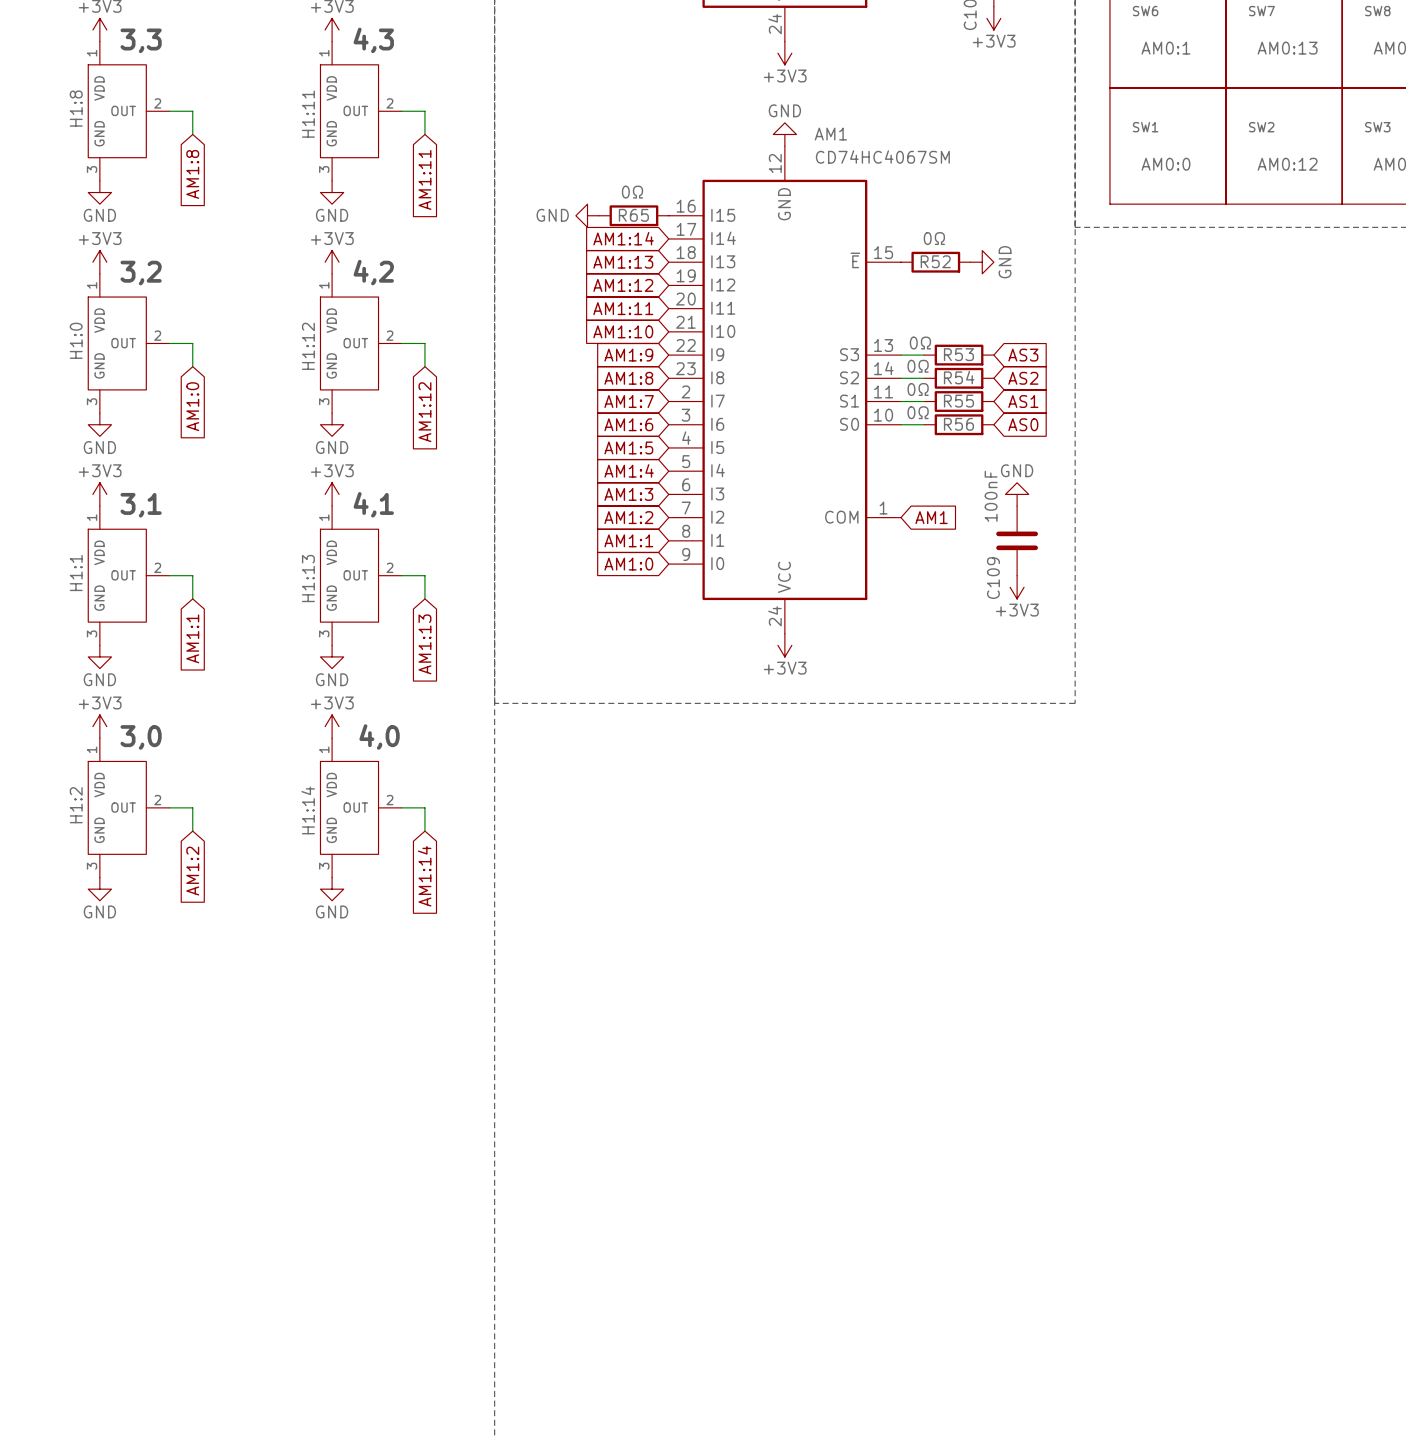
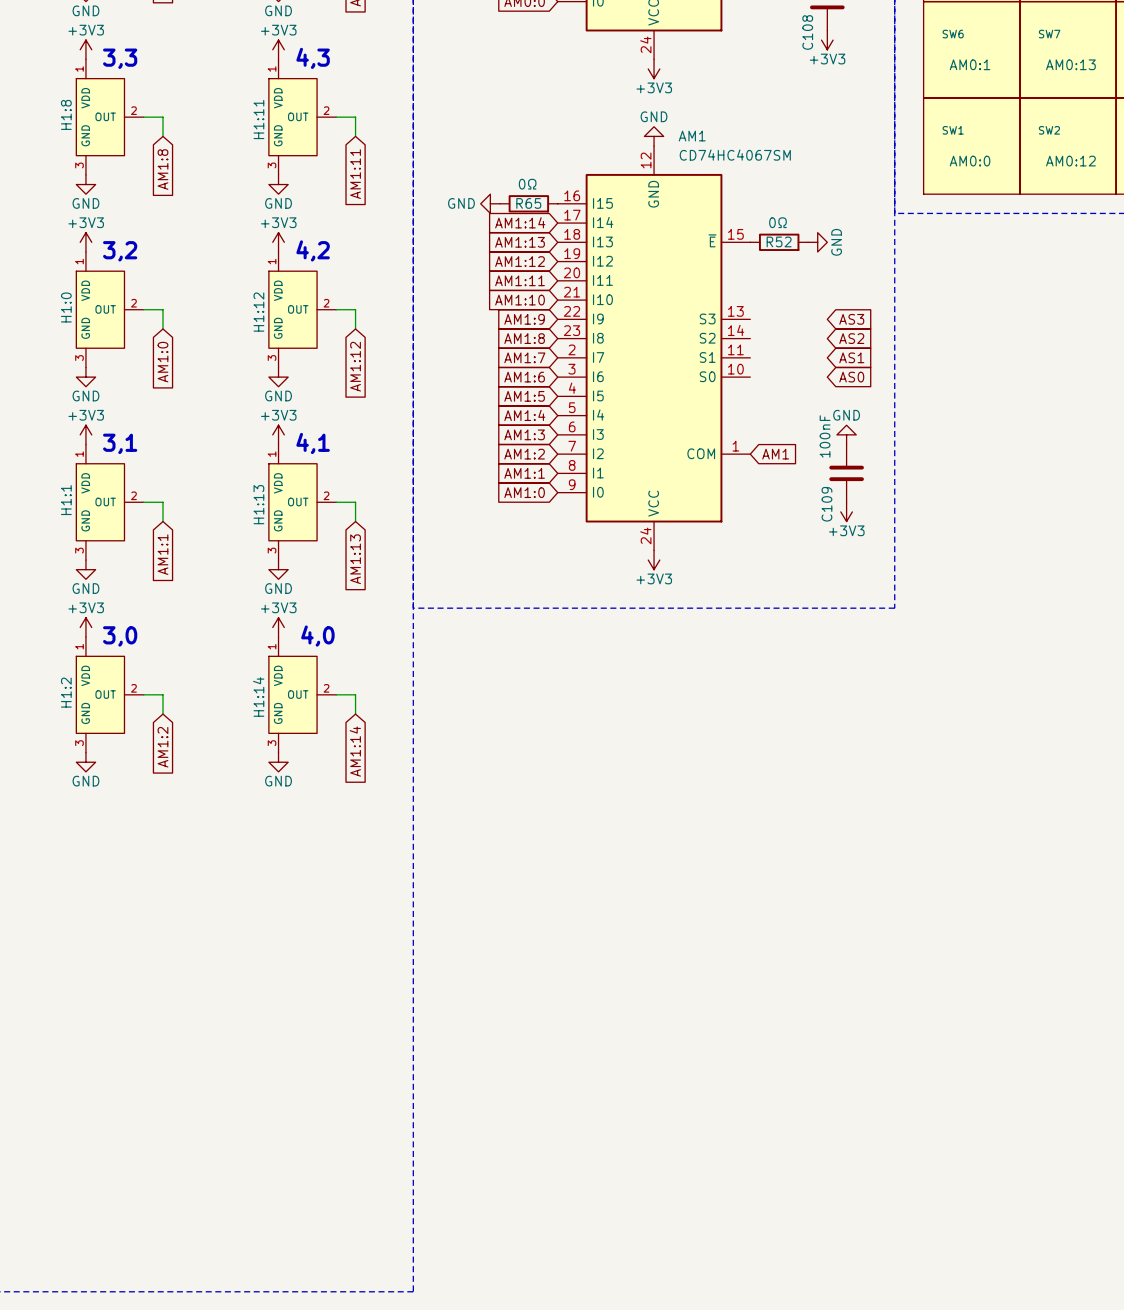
wire: (900, 355) (924, 355) -> none
R53: 0Ω (959, 355) -> none
wire: (900, 378) (924, 378) -> none
R54: 0Ω (959, 378) -> none
wire: (900, 401) (924, 401) -> none
R55: 0Ω (959, 401) -> none
wire: (900, 424) (924, 424) -> none
R56: 0Ω (959, 424) -> none

